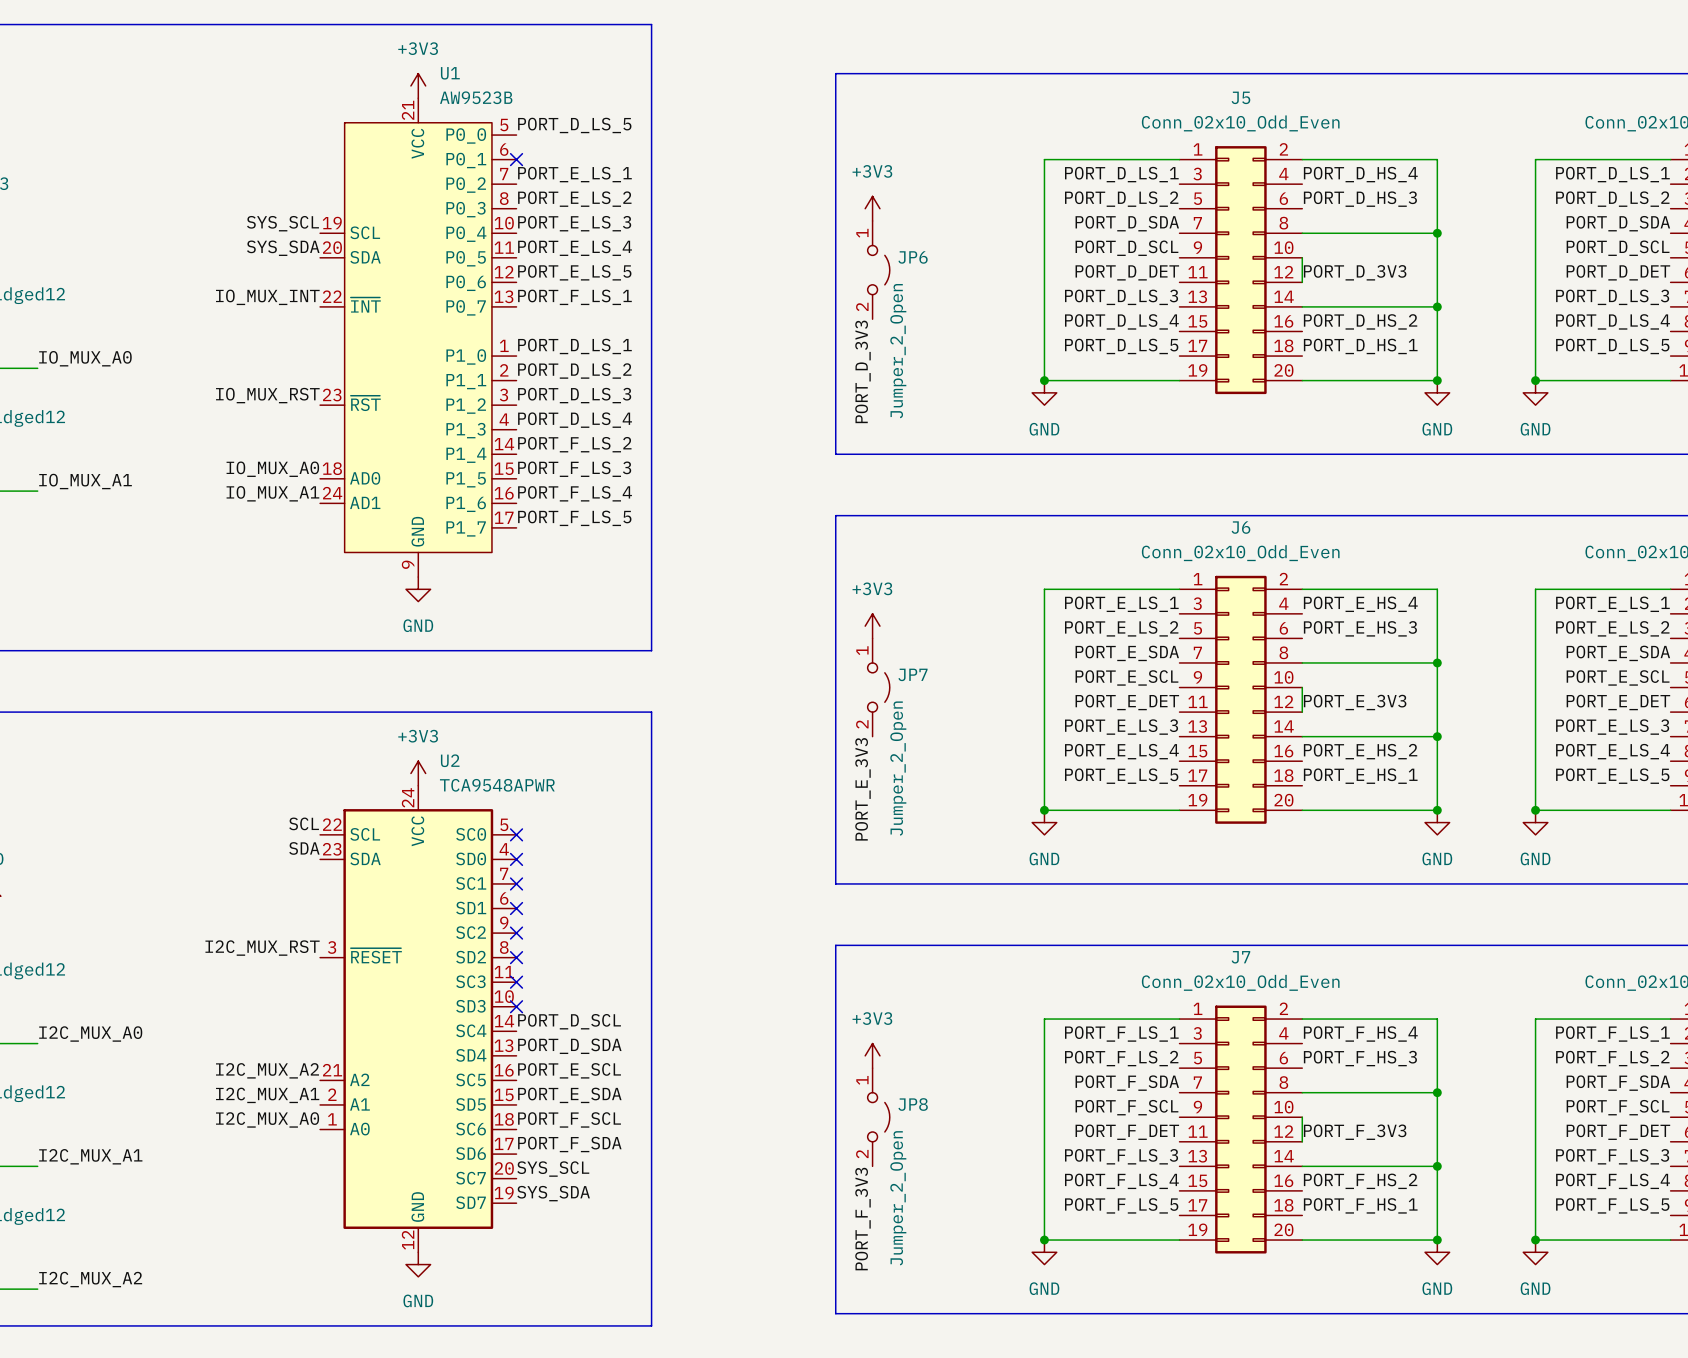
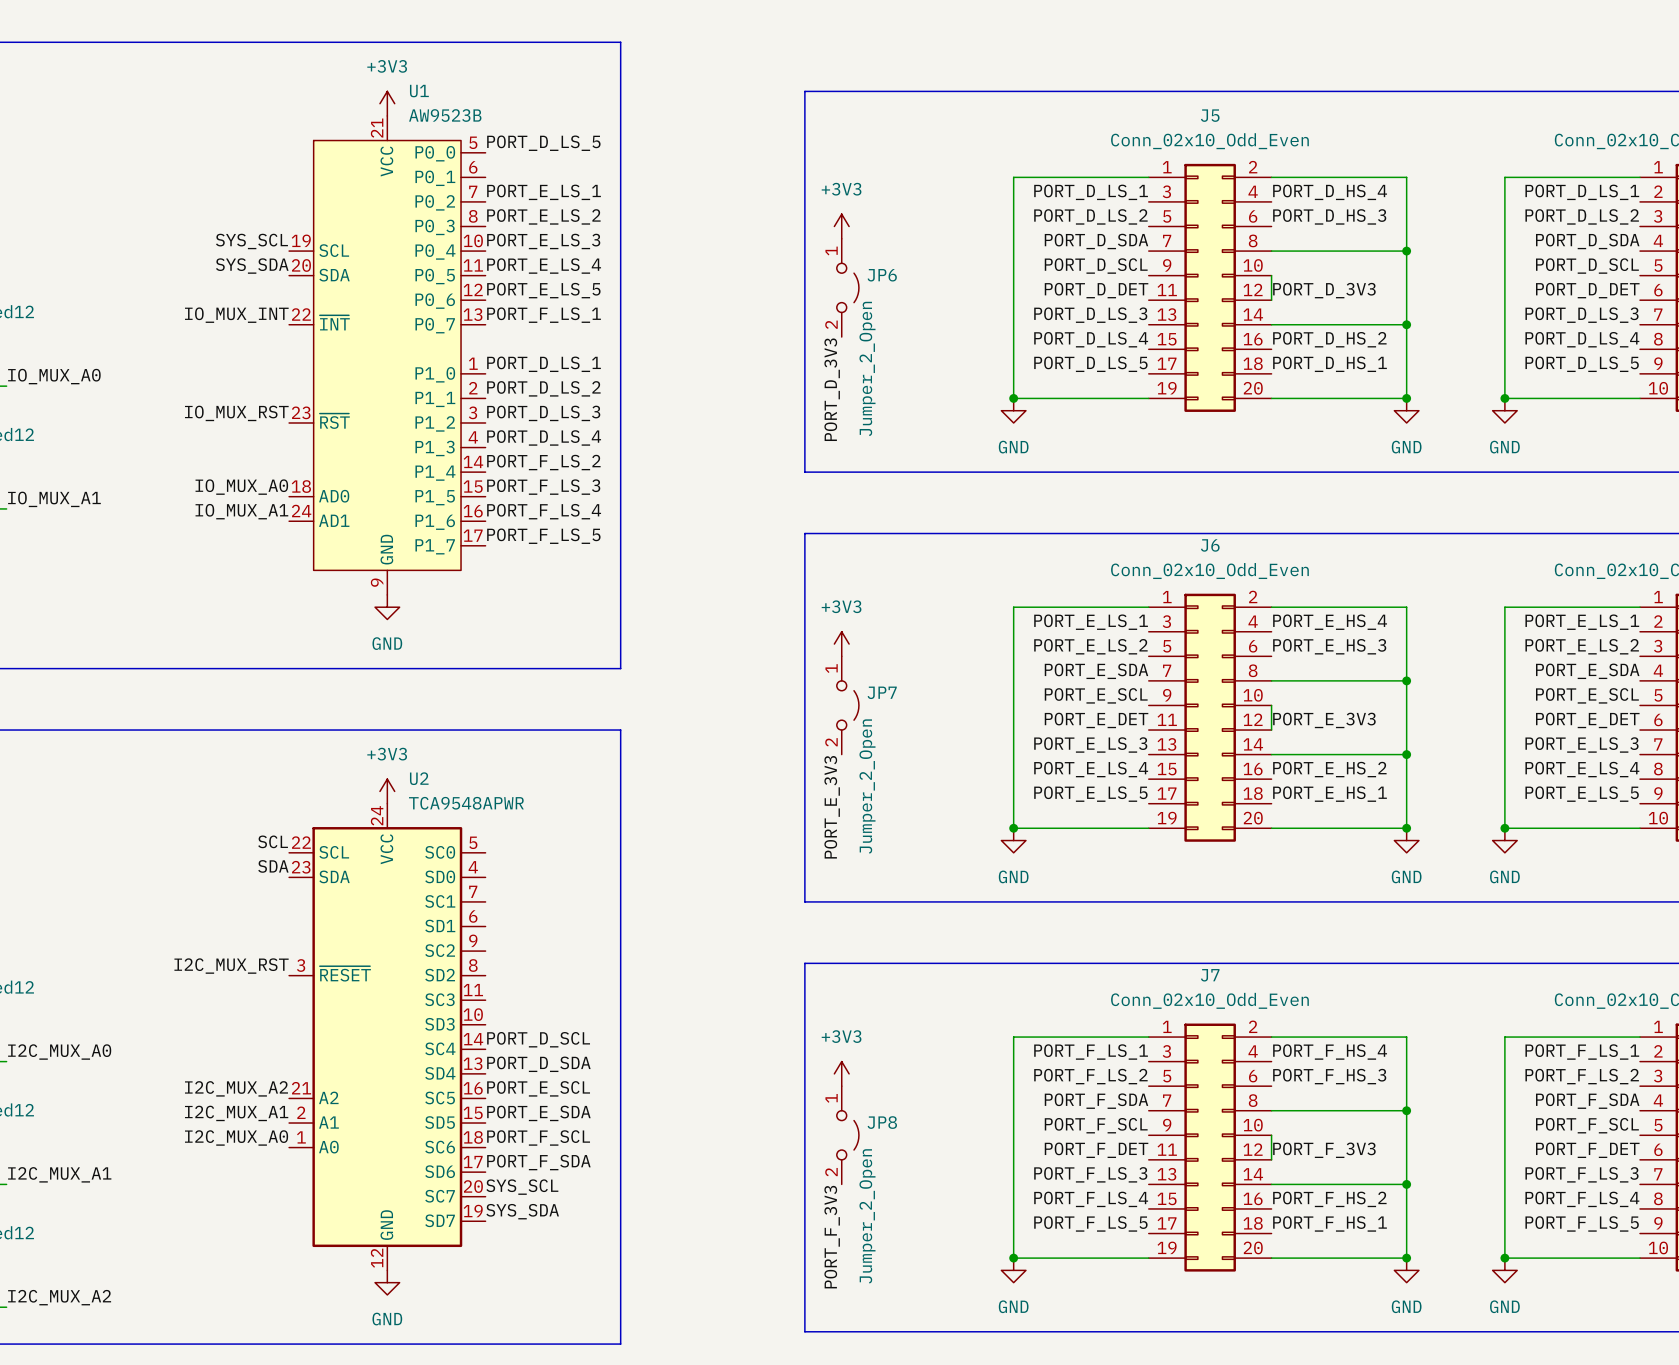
no-connect mark: (516, 159) -> none
no-connect mark: (516, 834) -> none
no-connect mark: (516, 859) -> none
no-connect mark: (516, 883) -> none
no-connect mark: (516, 908) -> none
no-connect mark: (516, 933) -> none
no-connect mark: (516, 957) -> none
no-connect mark: (516, 982) -> none
no-connect mark: (516, 1006) -> none

